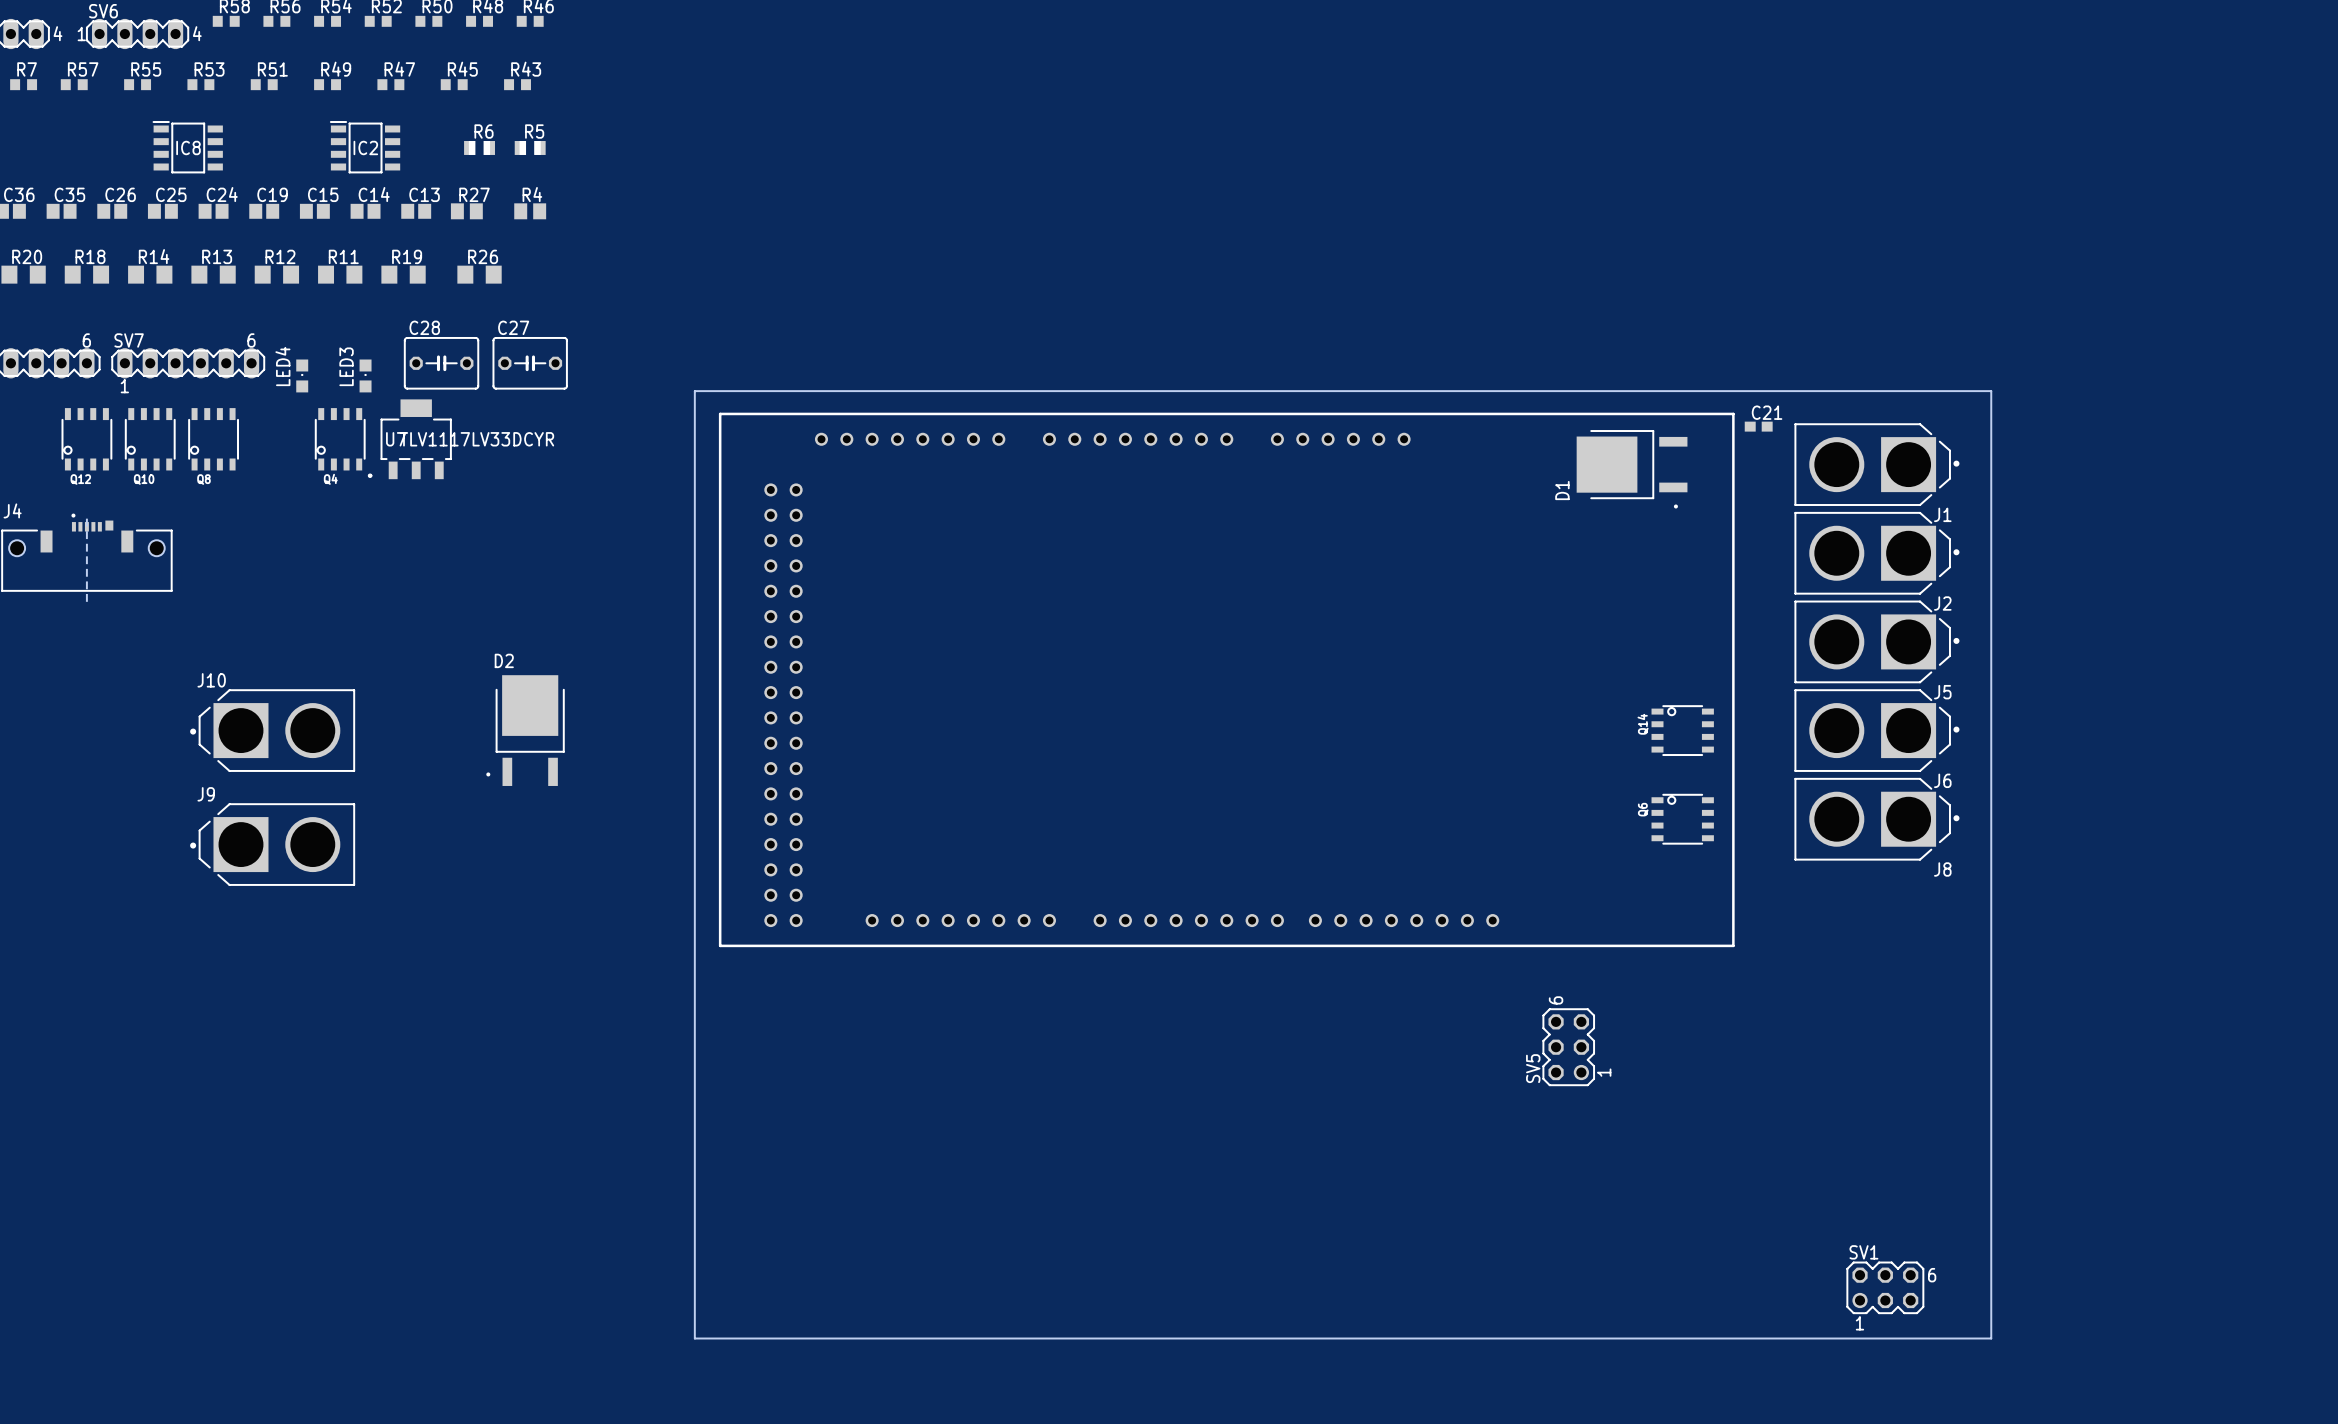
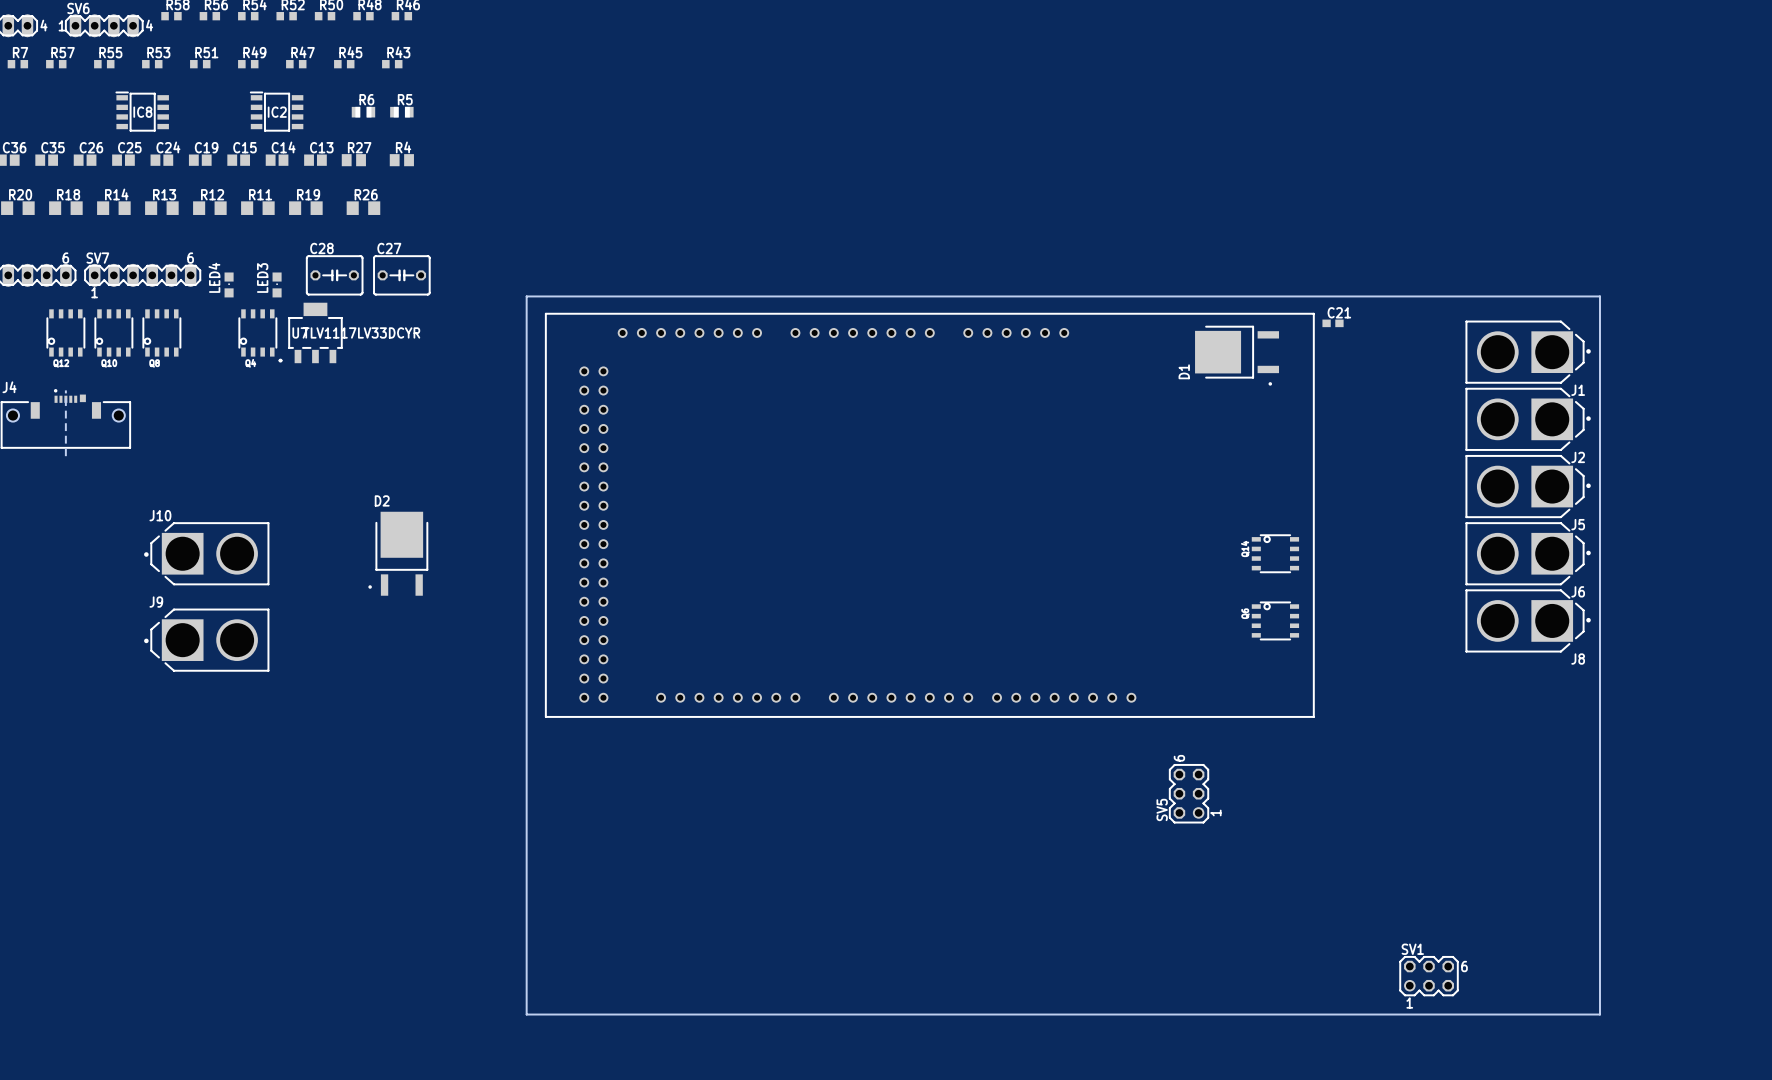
board edge: (1991, 391) (1991, 1338) -> (1509, 296) (1599, 296) (1599, 1014) (1509, 1014)
J1 position: (1877, 464) -> (1528, 352)
J2 position: (1877, 553) -> (1528, 419)
J5 position: (1877, 641) -> (1528, 486)
J6 position: (1877, 730) -> (1528, 553)
J8 position: (1877, 819) -> (1528, 620)

